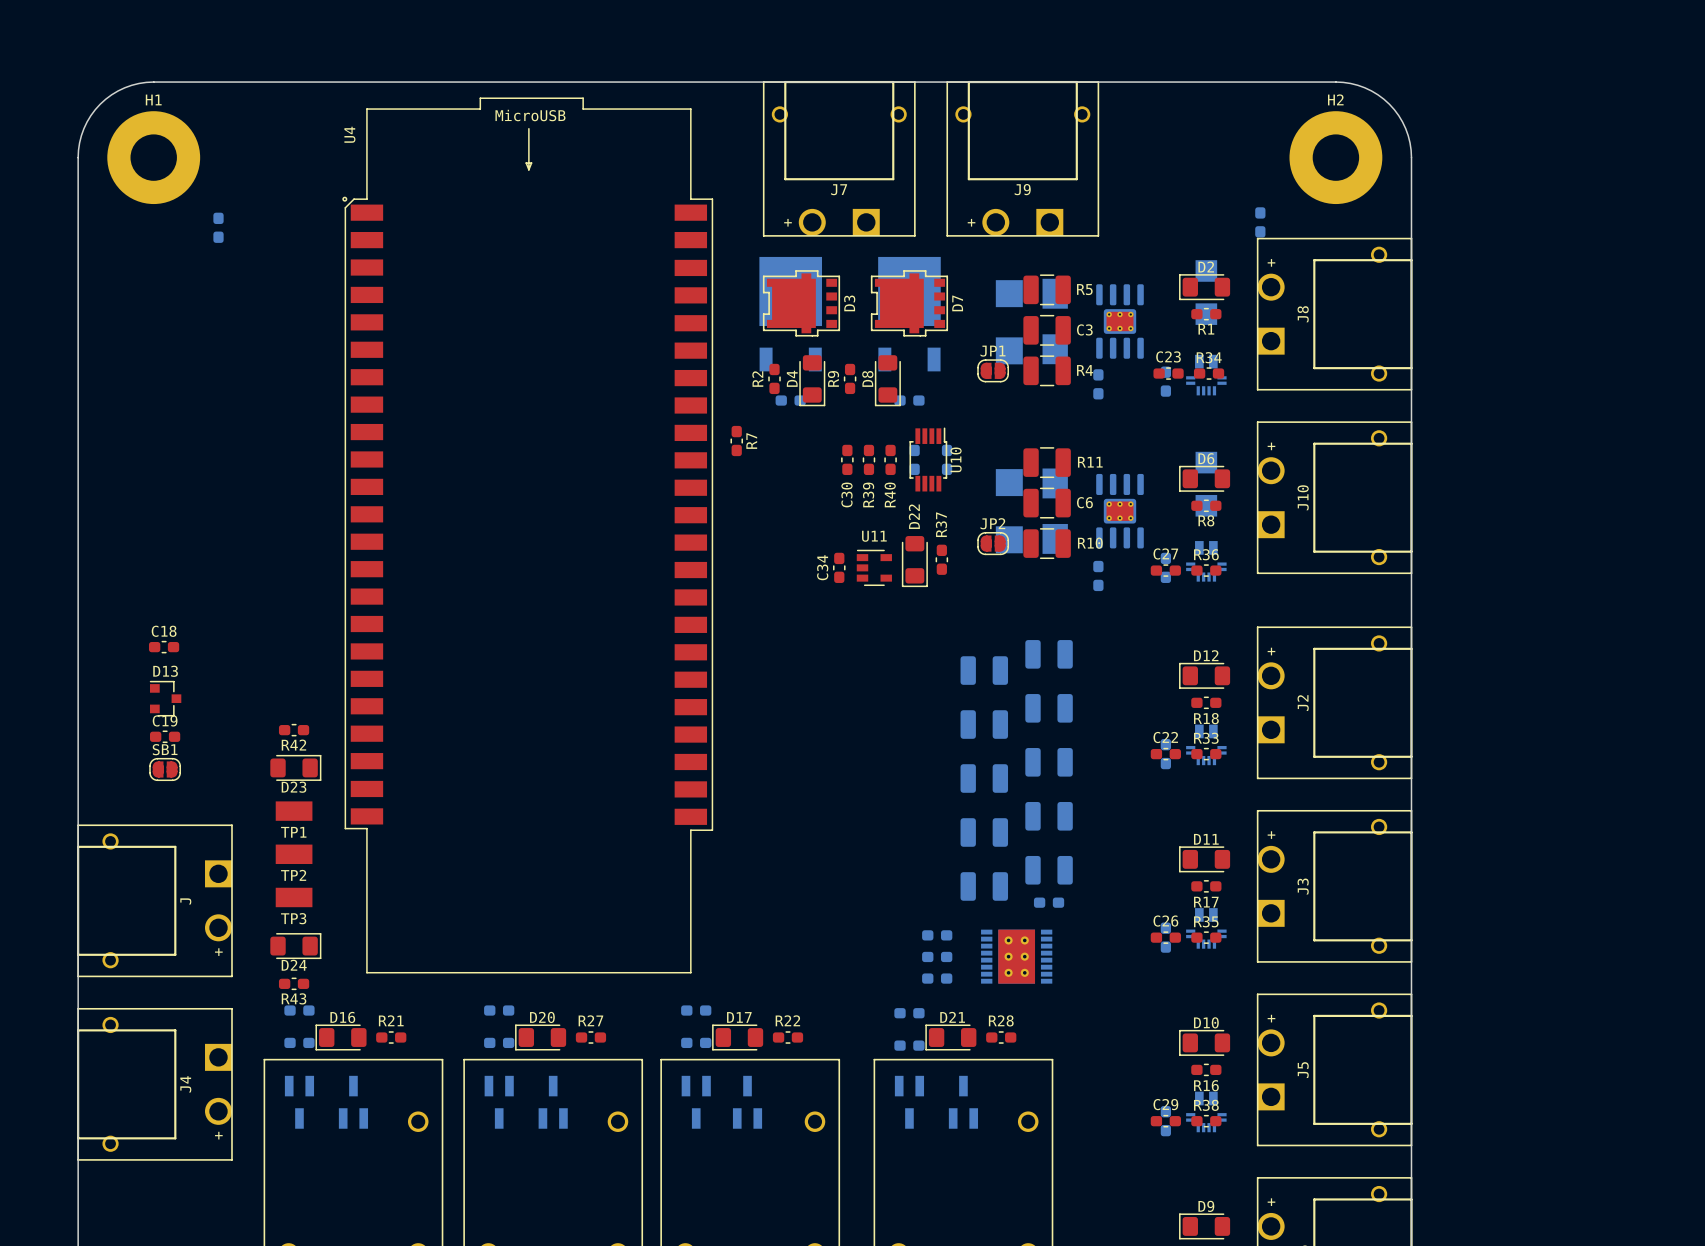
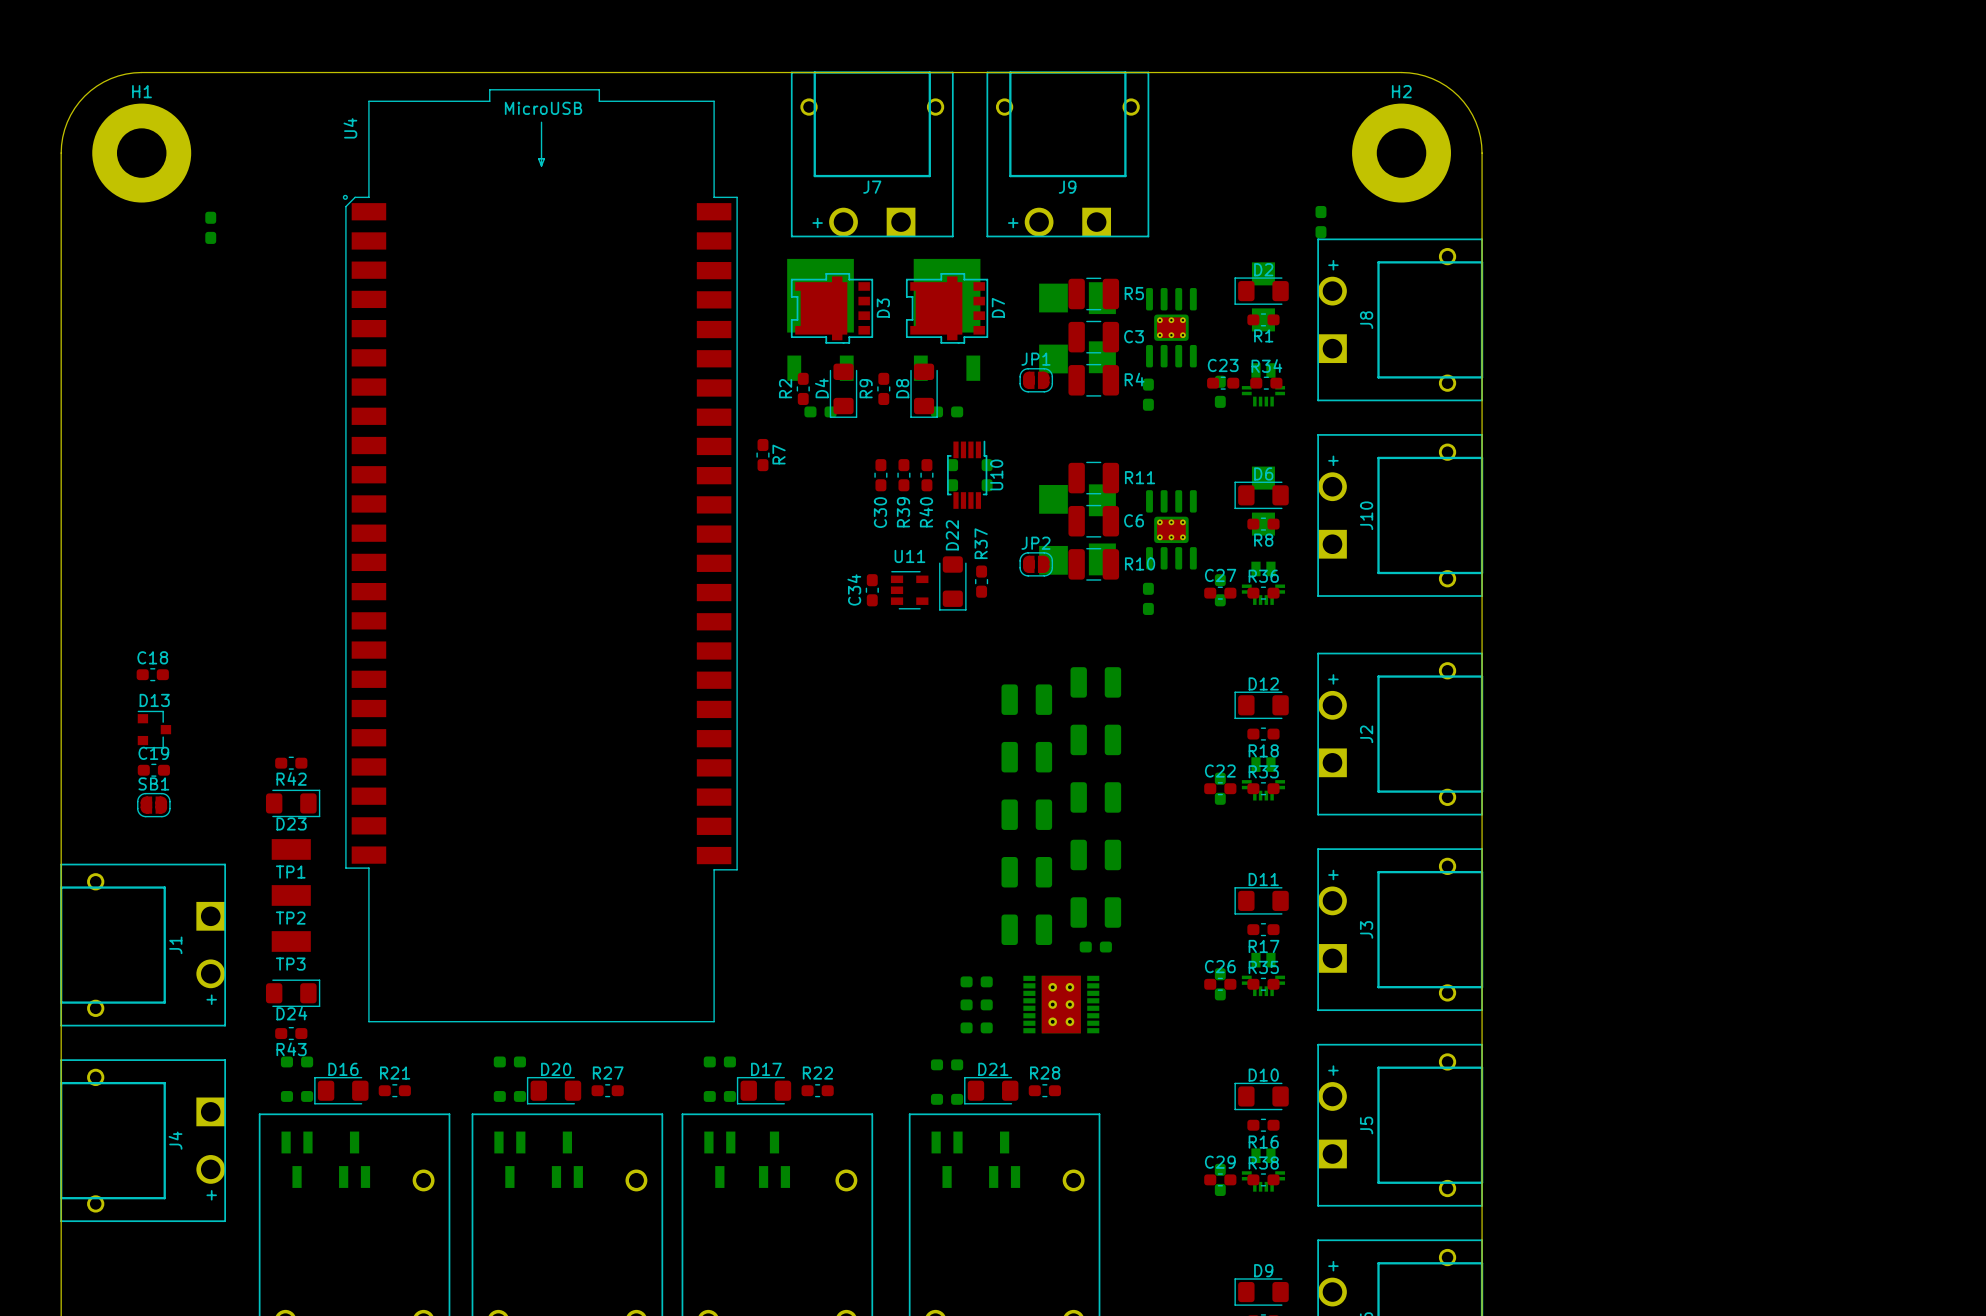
J name: J (185, 901) -> J1 (175, 945)

